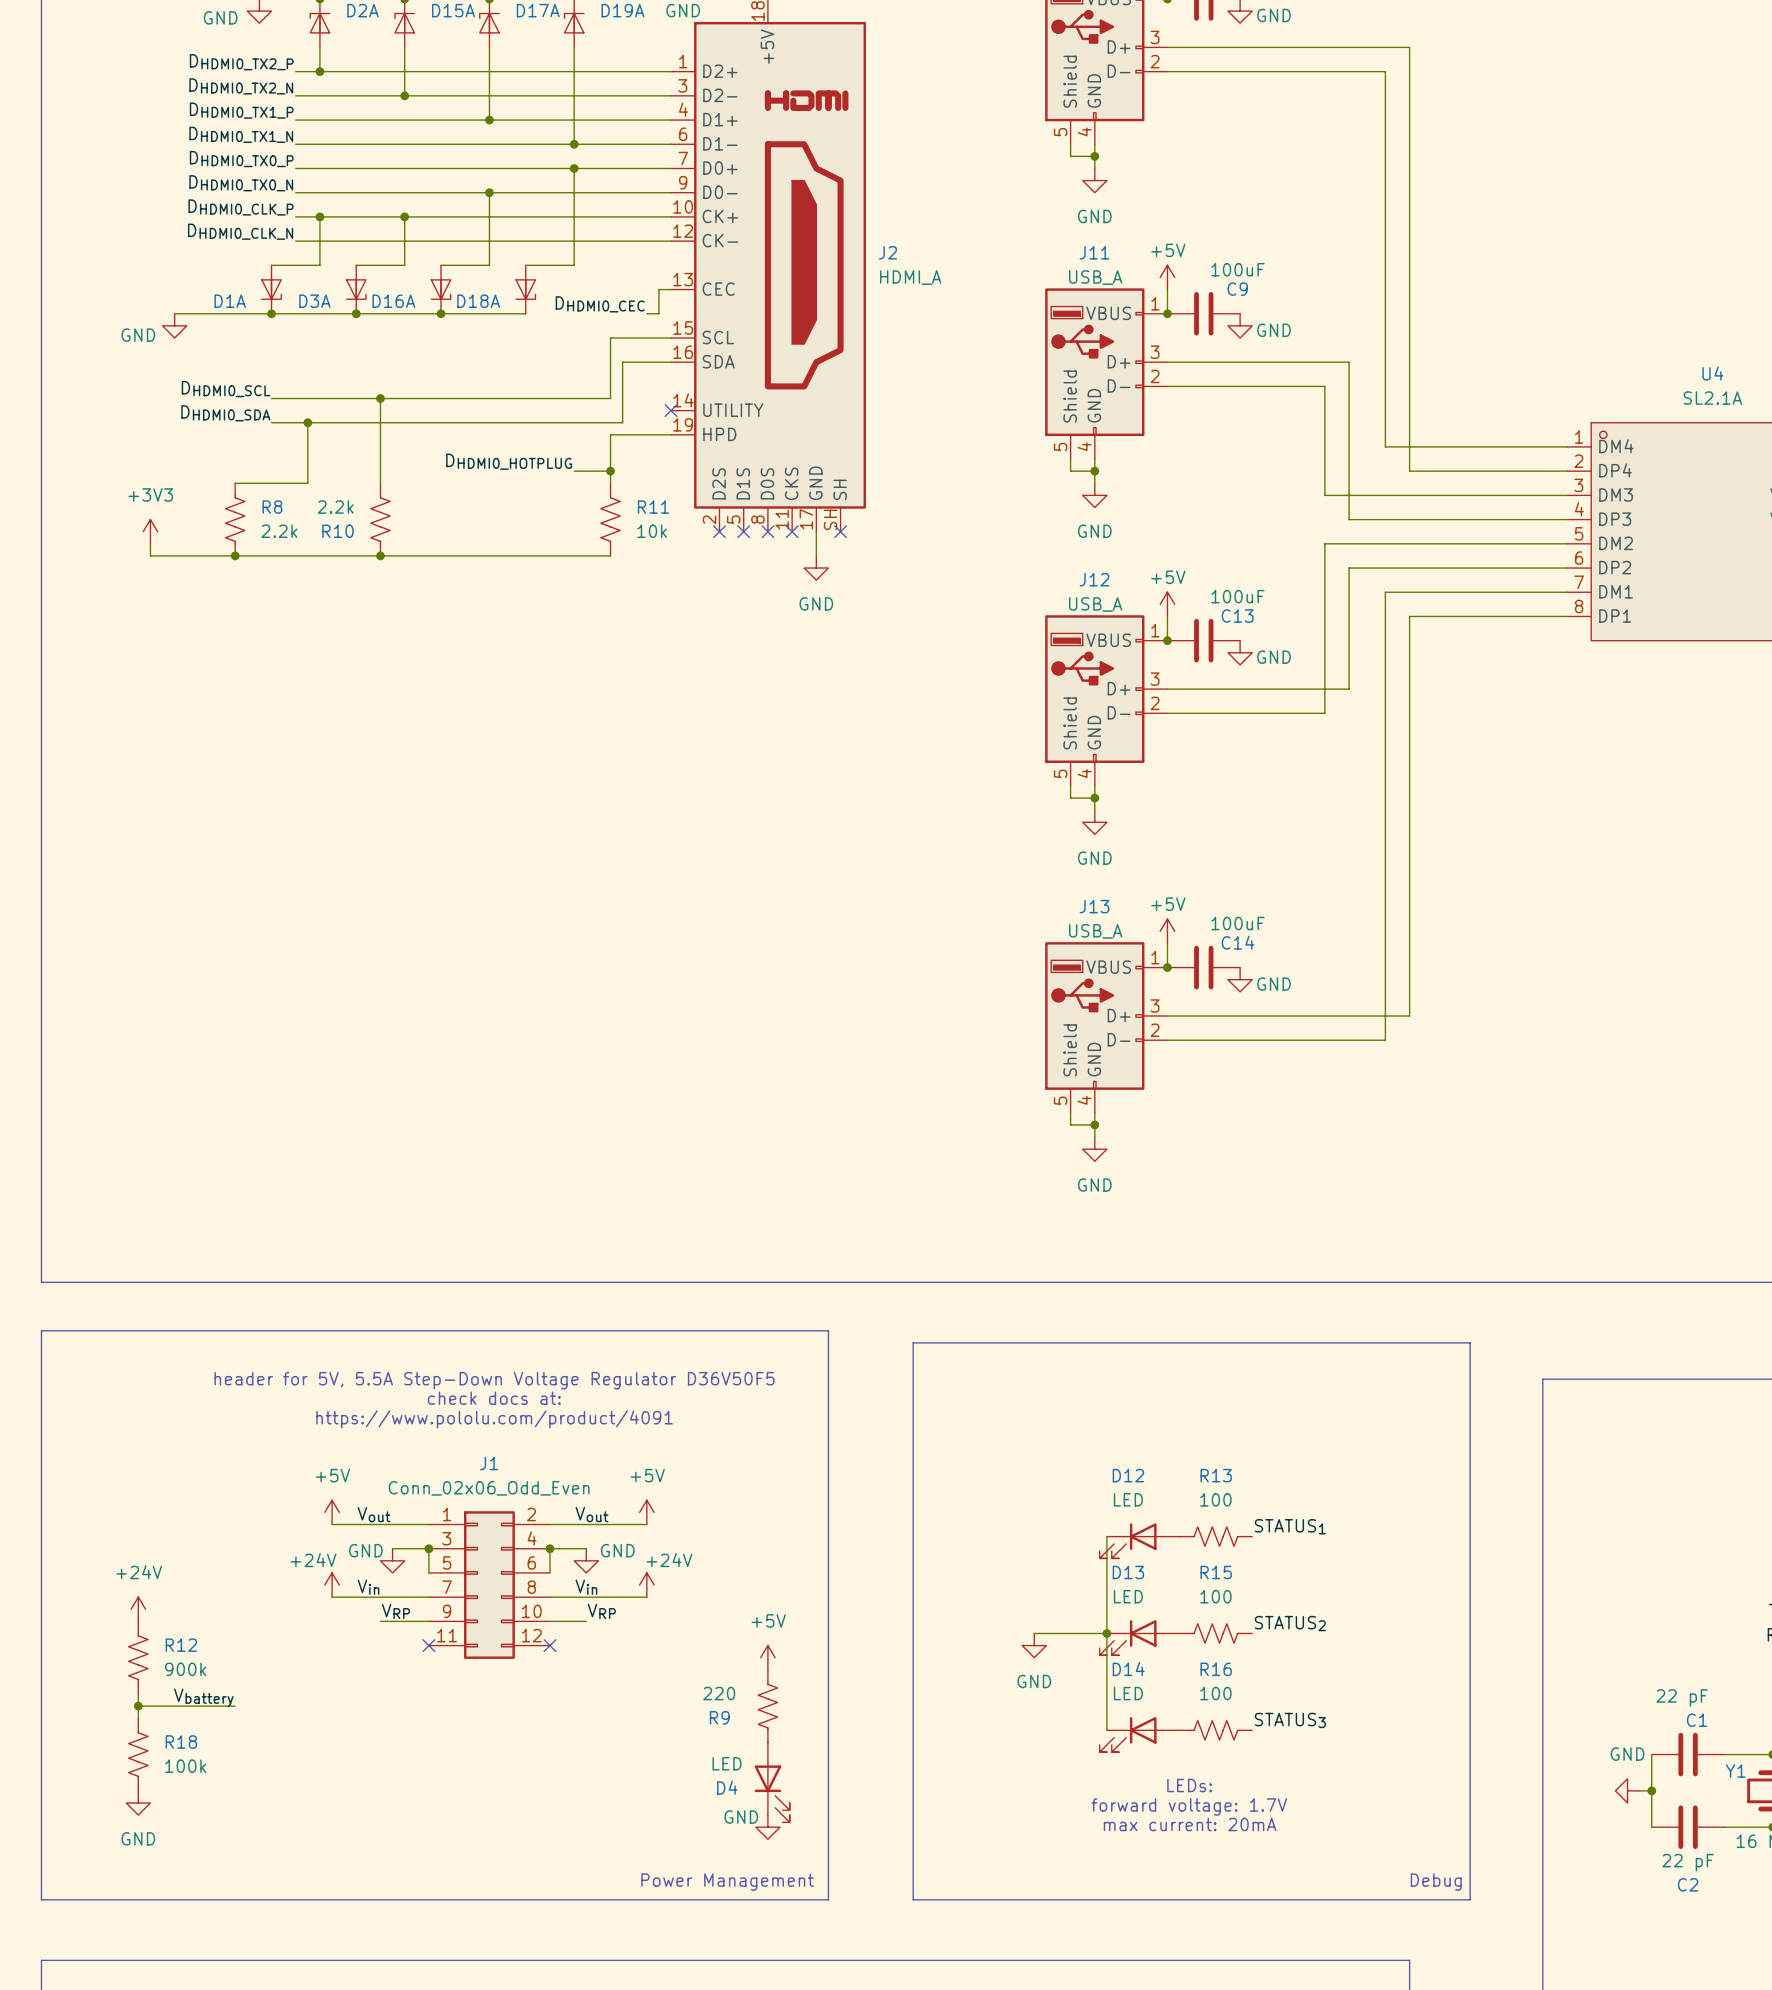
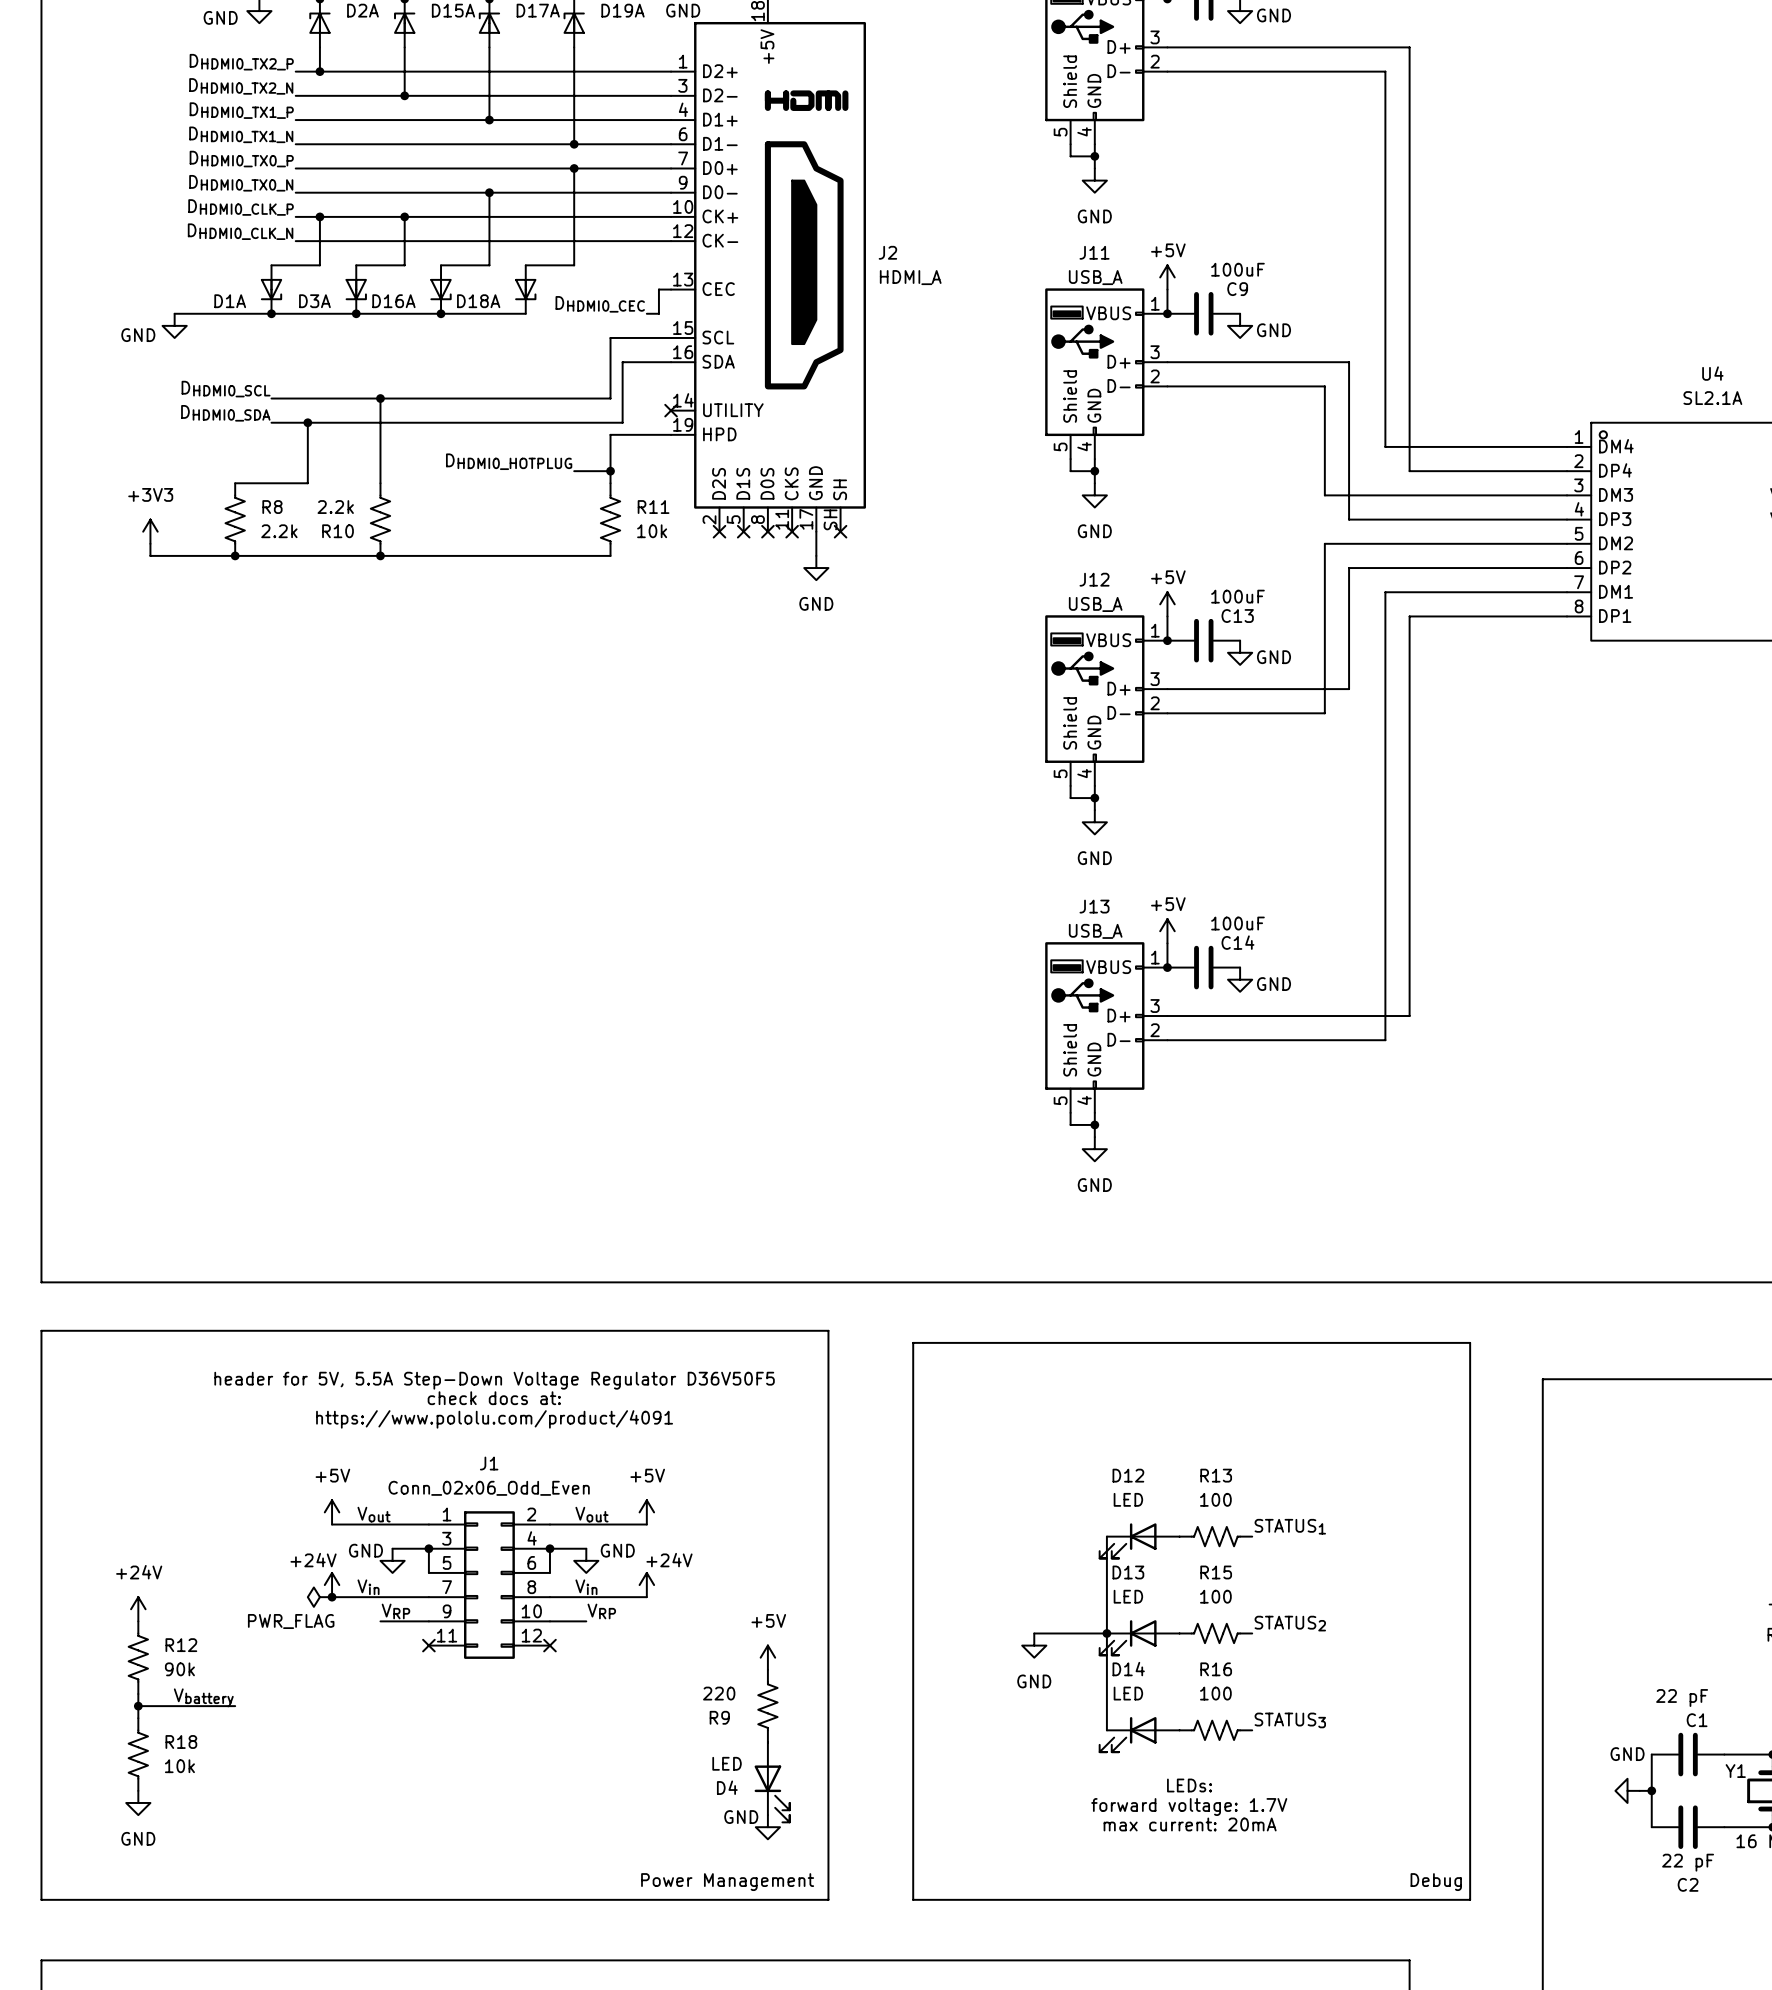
power symbol: none -> PWR_FLAG (319, 1597)
junction: none -> (332, 1597)
R12 value: 900k (185, 1669) -> 90k (179, 1669)
R18 value: 100k (185, 1766) -> 10k (179, 1766)

